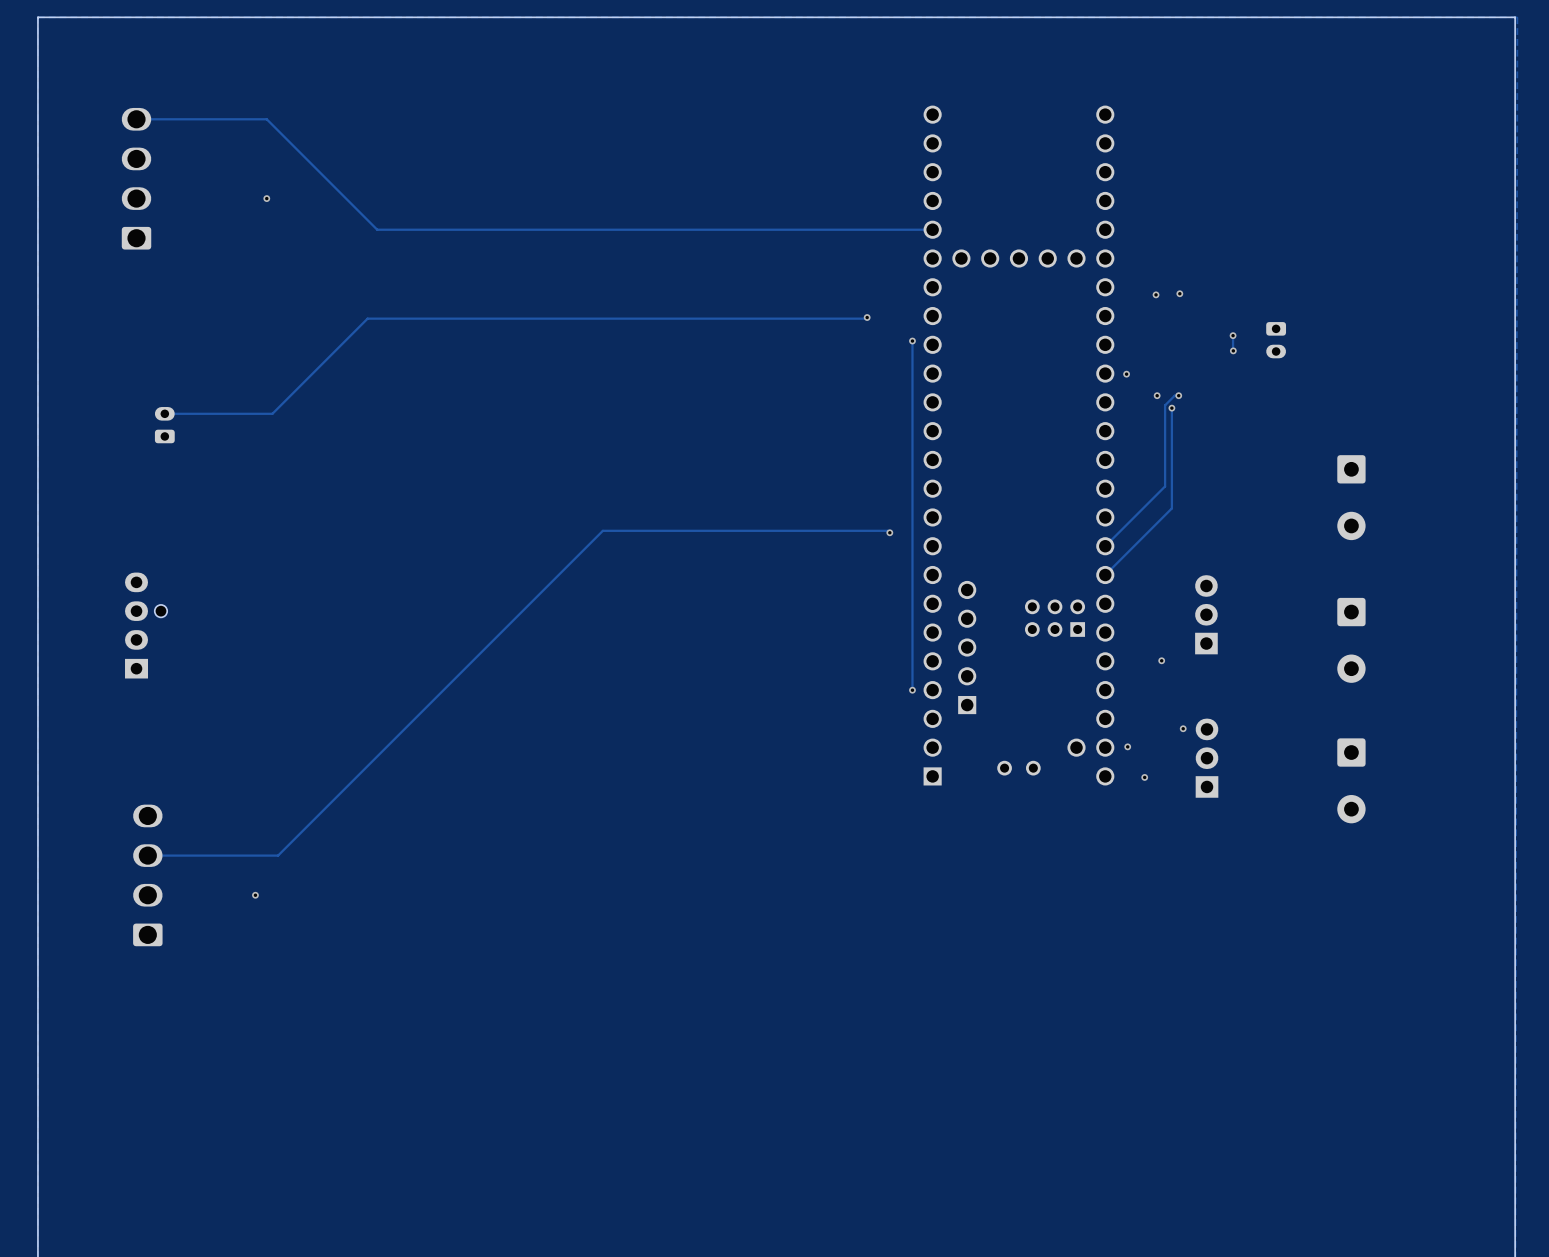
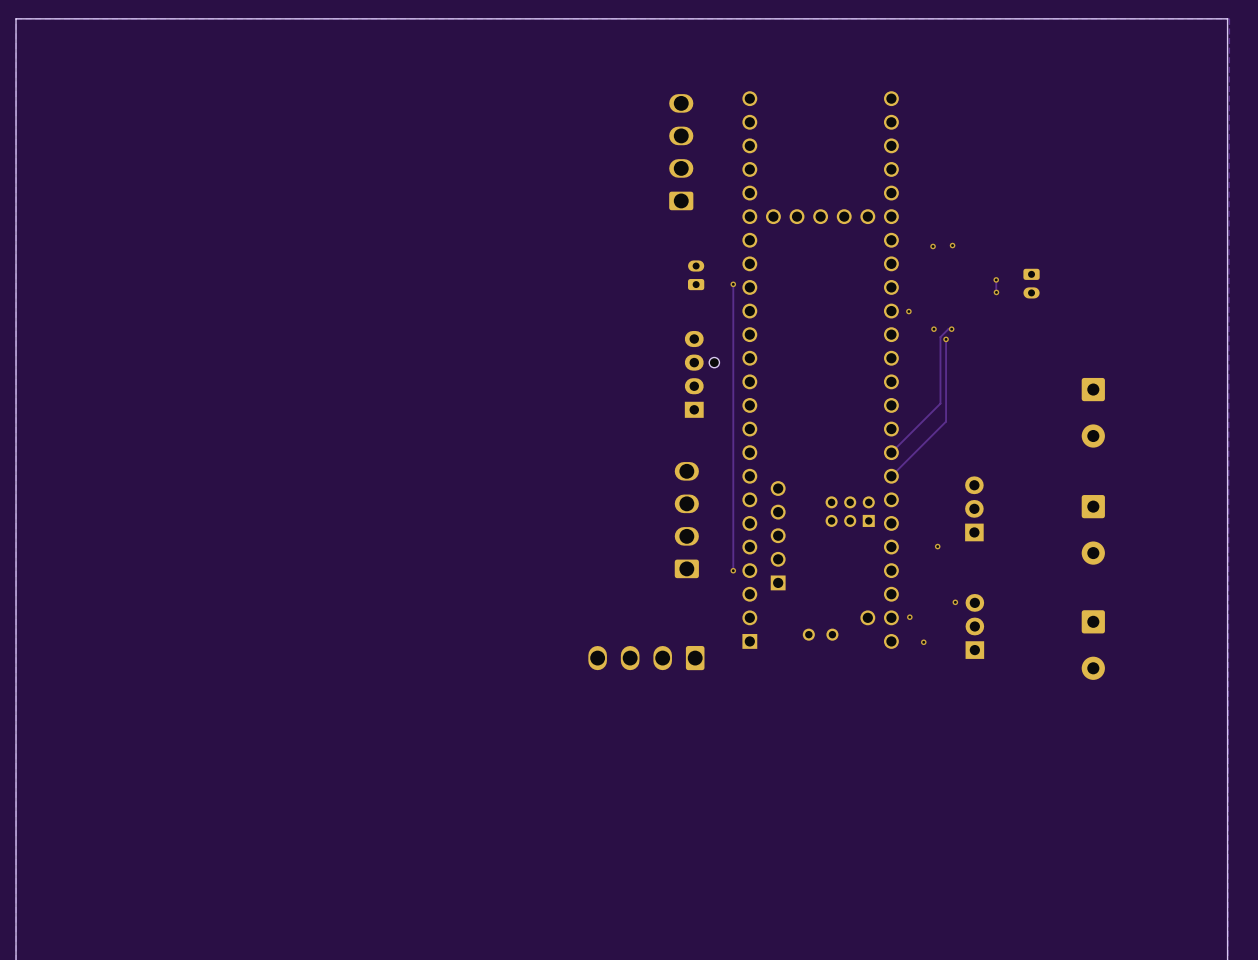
track: (136, 119) (266, 119) (377, 229) (932, 229) -> none
part: (136, 178) -> none
part: none -> (681, 152)
via: (266, 198) -> none
track: (867, 317) (367, 318) (272, 413) (164, 413) -> none
via: (867, 317) -> none
part: none -> (696, 275)
part: (164, 425) -> none
part: none -> (702, 374)
track: (889, 532) (887, 530) (602, 530) (278, 855) (147, 855) -> none
via: (889, 532) -> none
part: (146, 625) -> none
part: none -> (686, 520)
part: none -> (646, 658)
part: (147, 875) -> none
via: (255, 895) -> none

